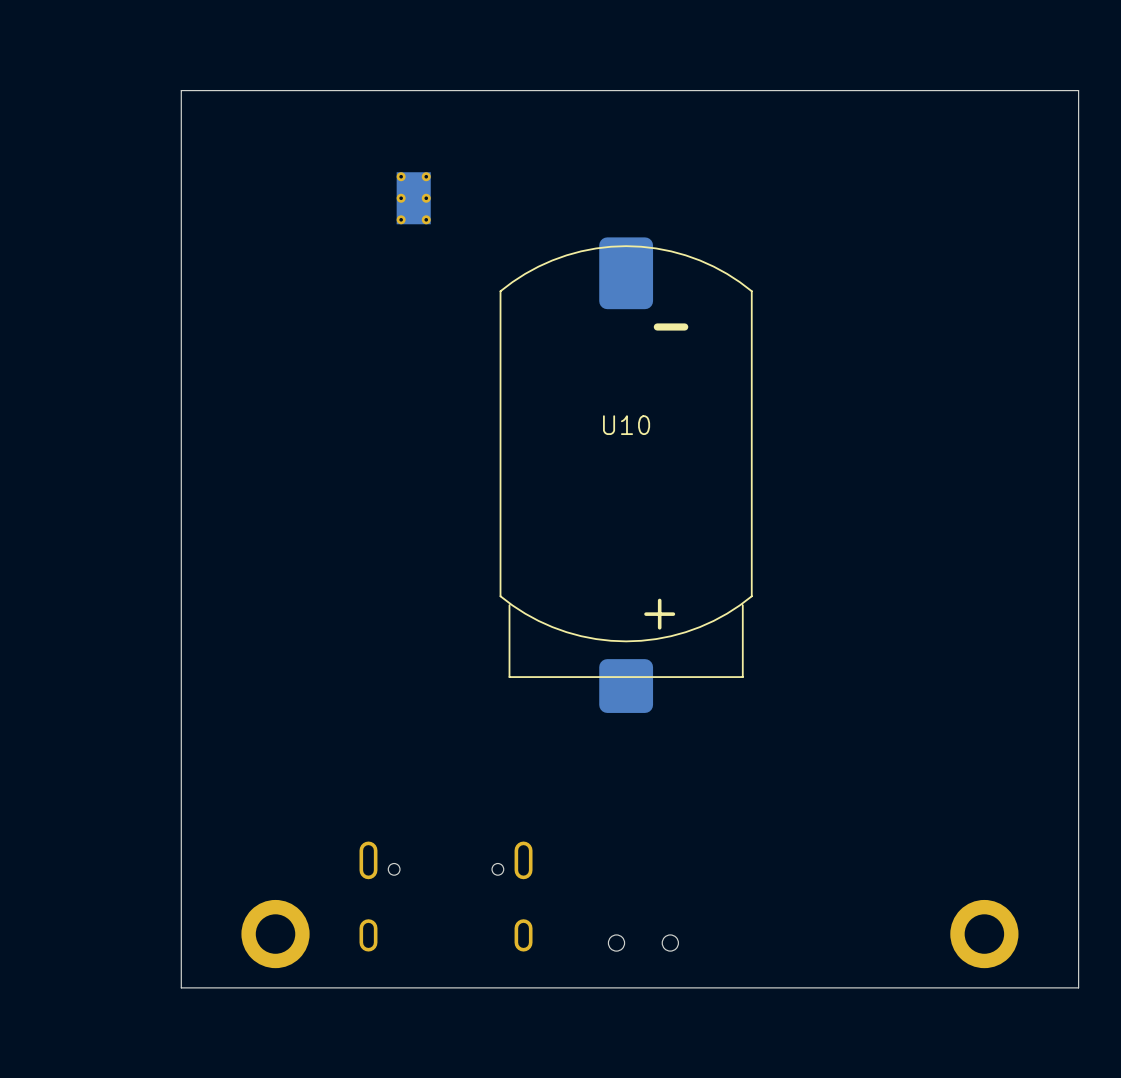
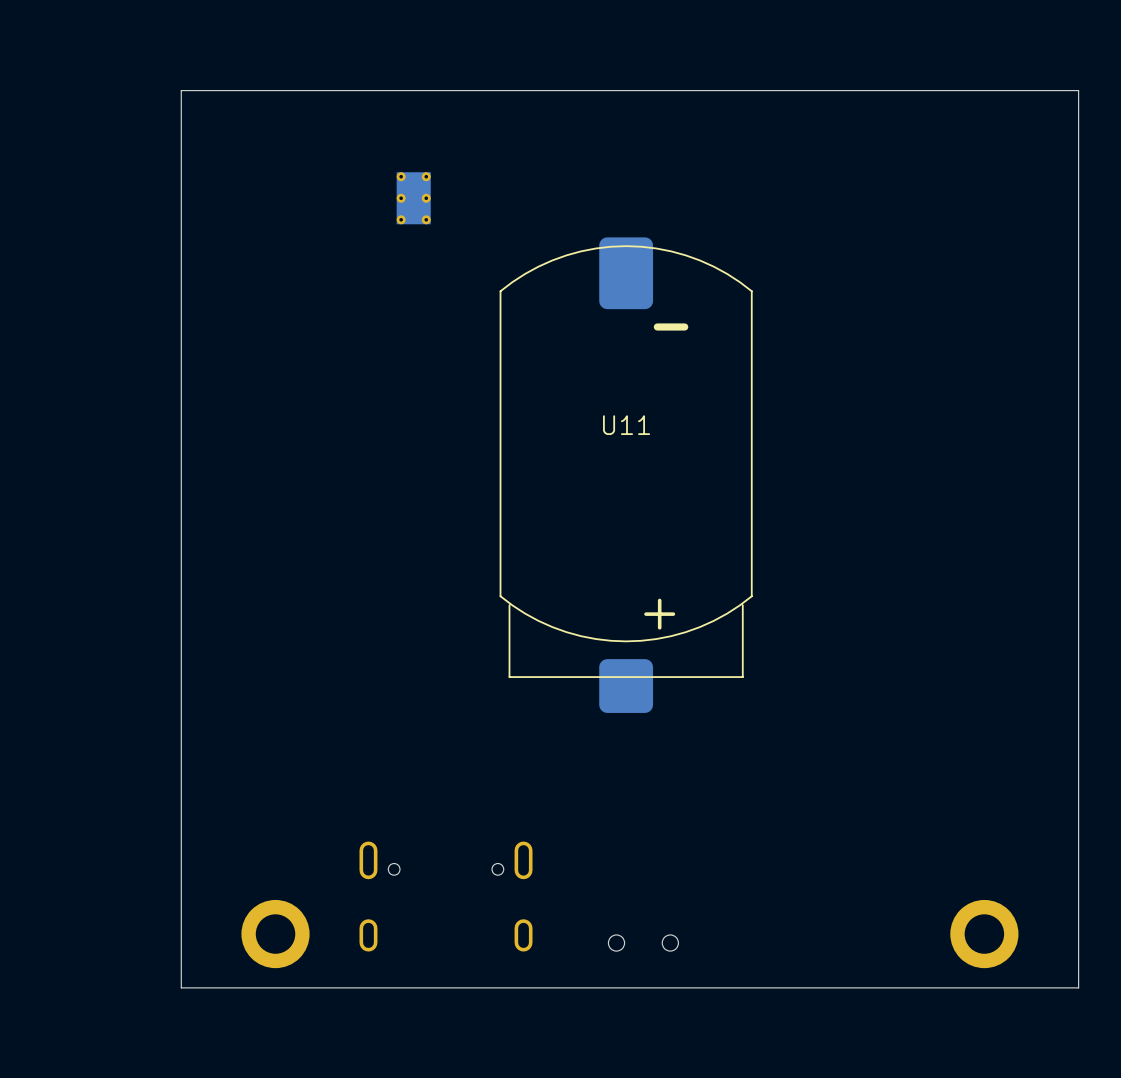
U10 name: U10 (626, 425) -> U11 (626, 425)

